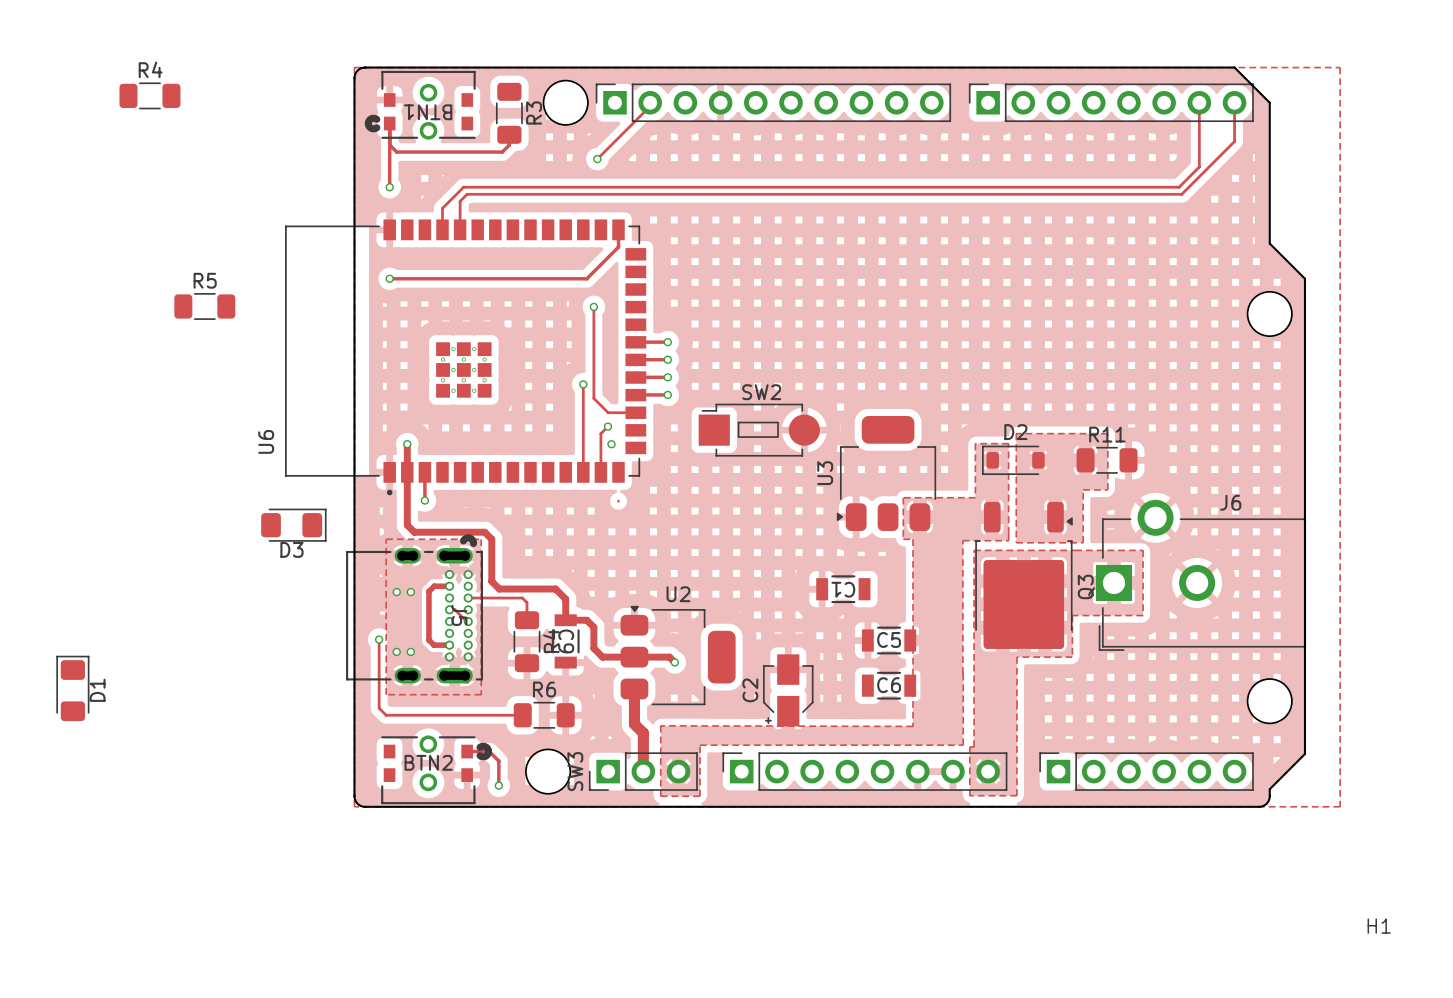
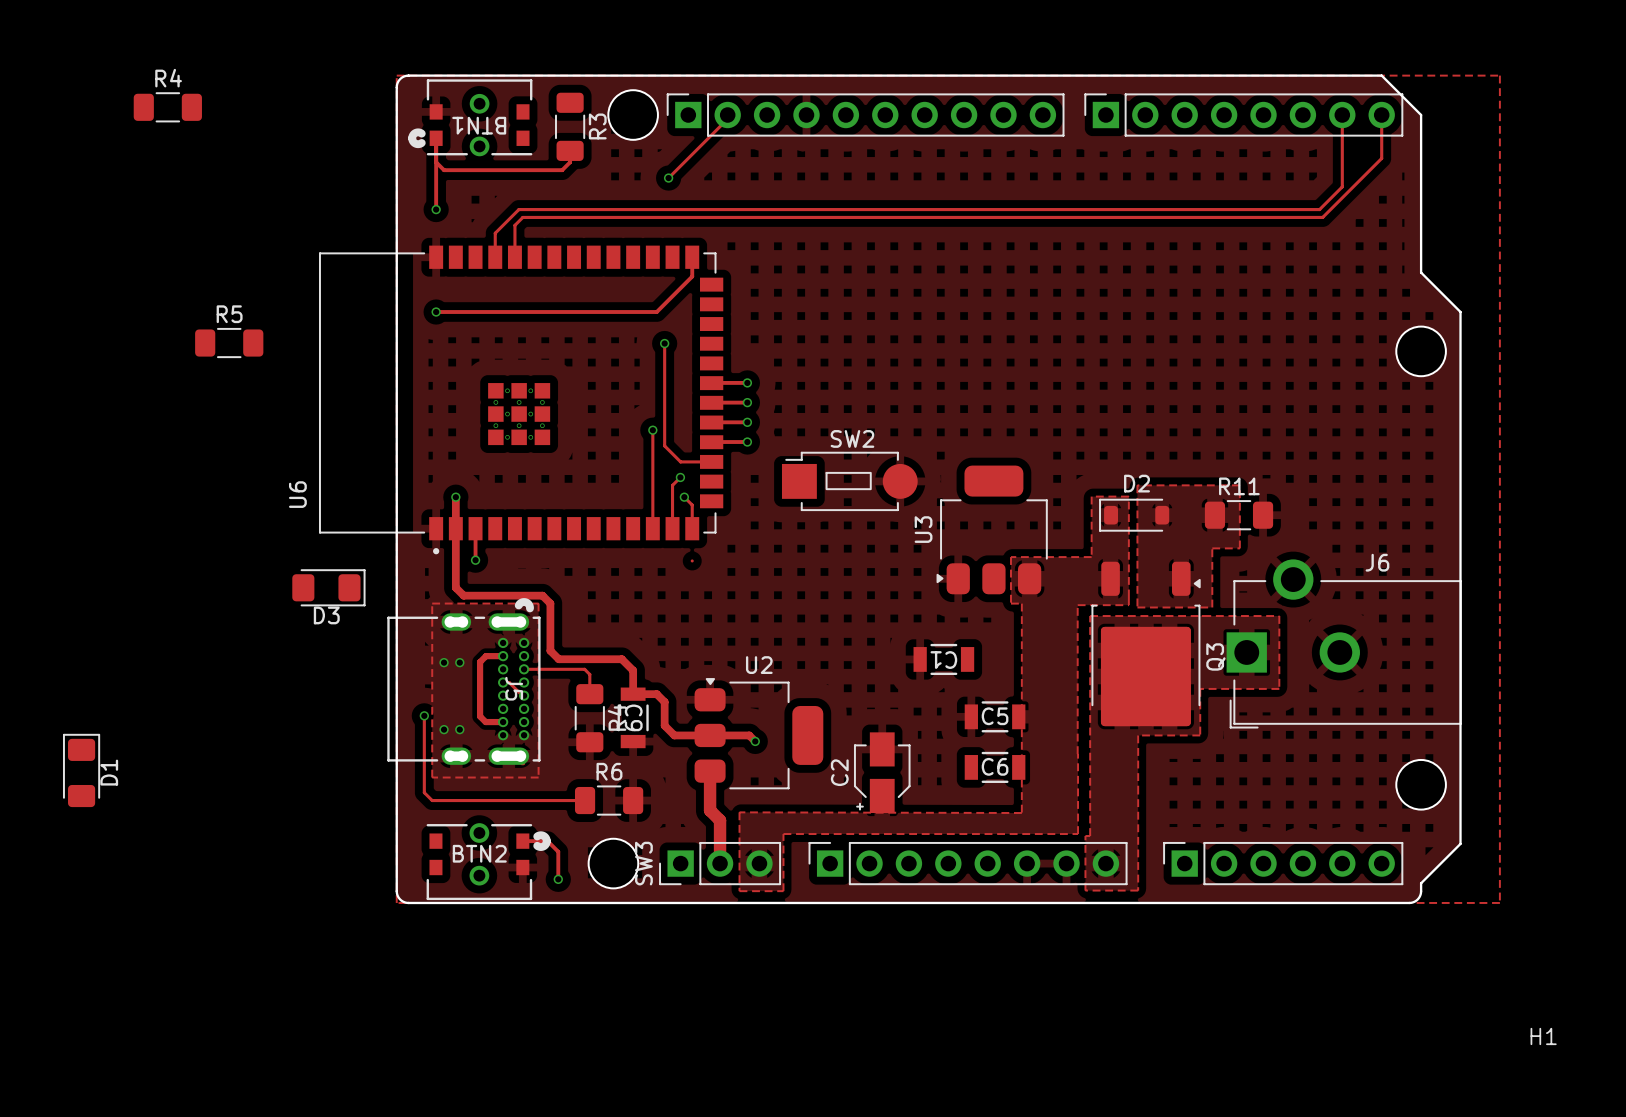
track: none -> (684, 497) (692, 505) (692, 528)

